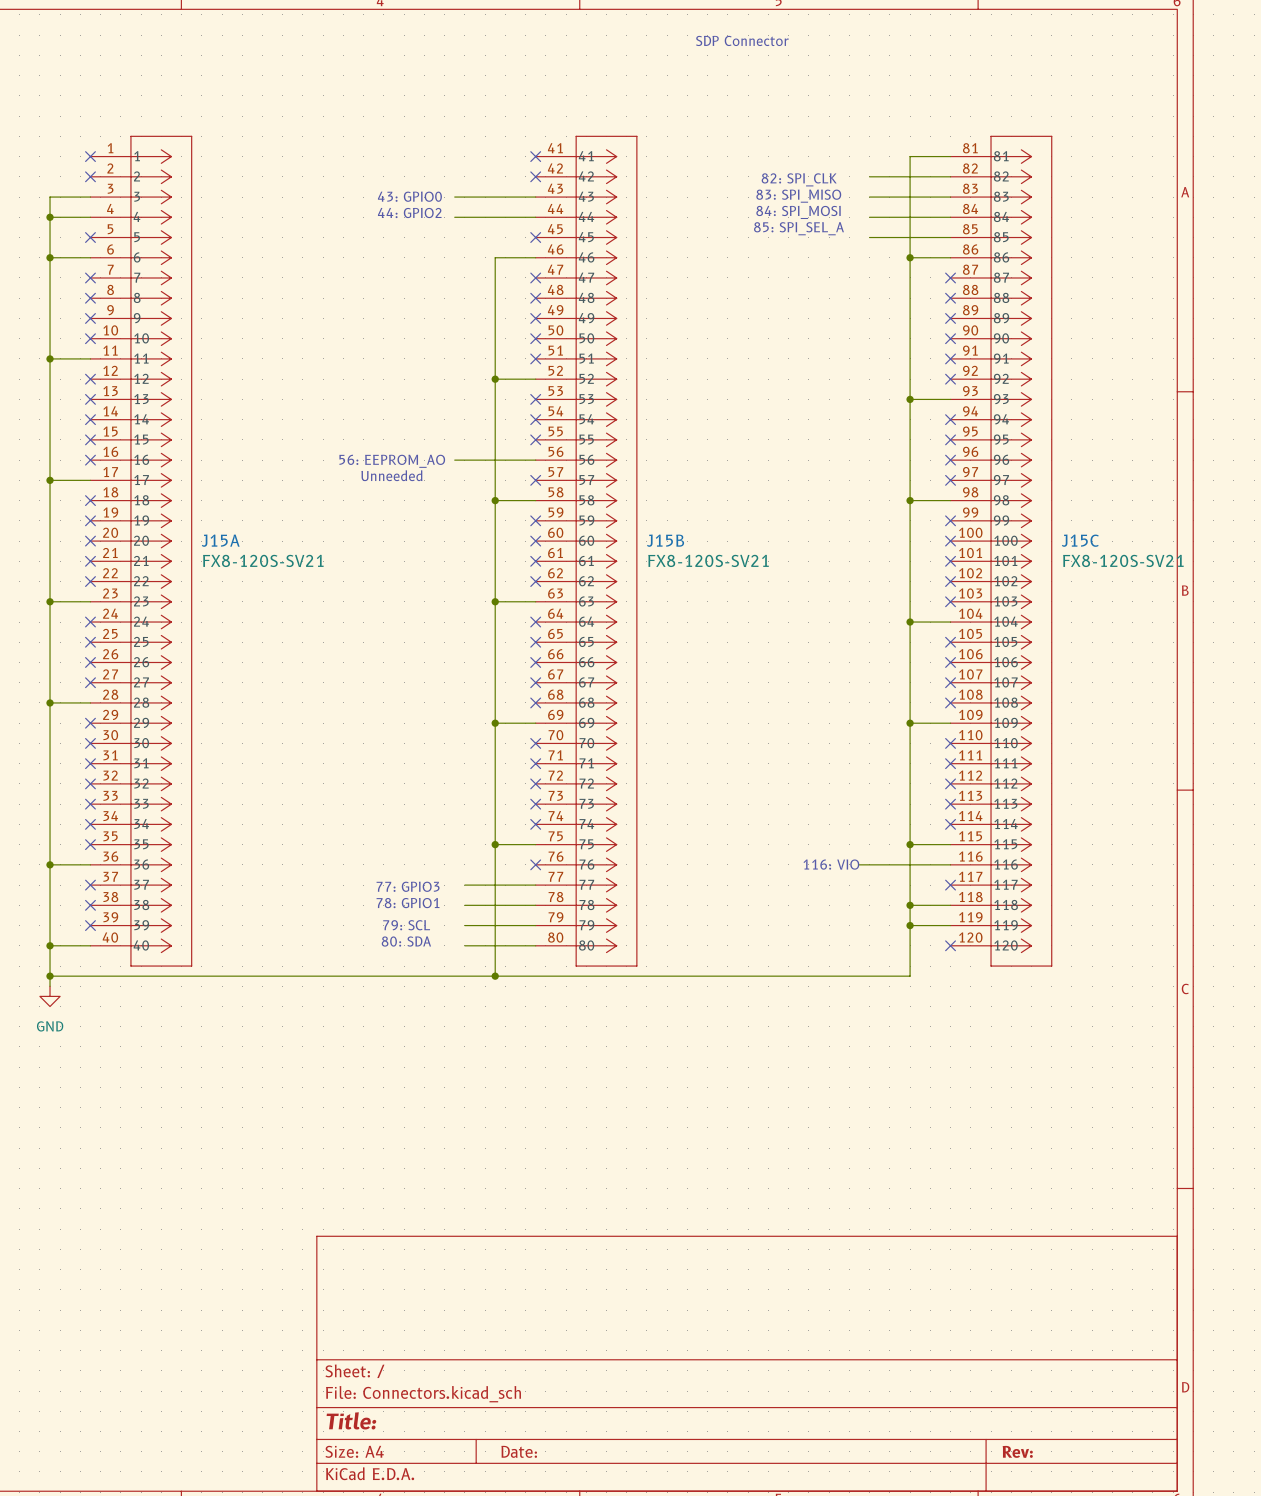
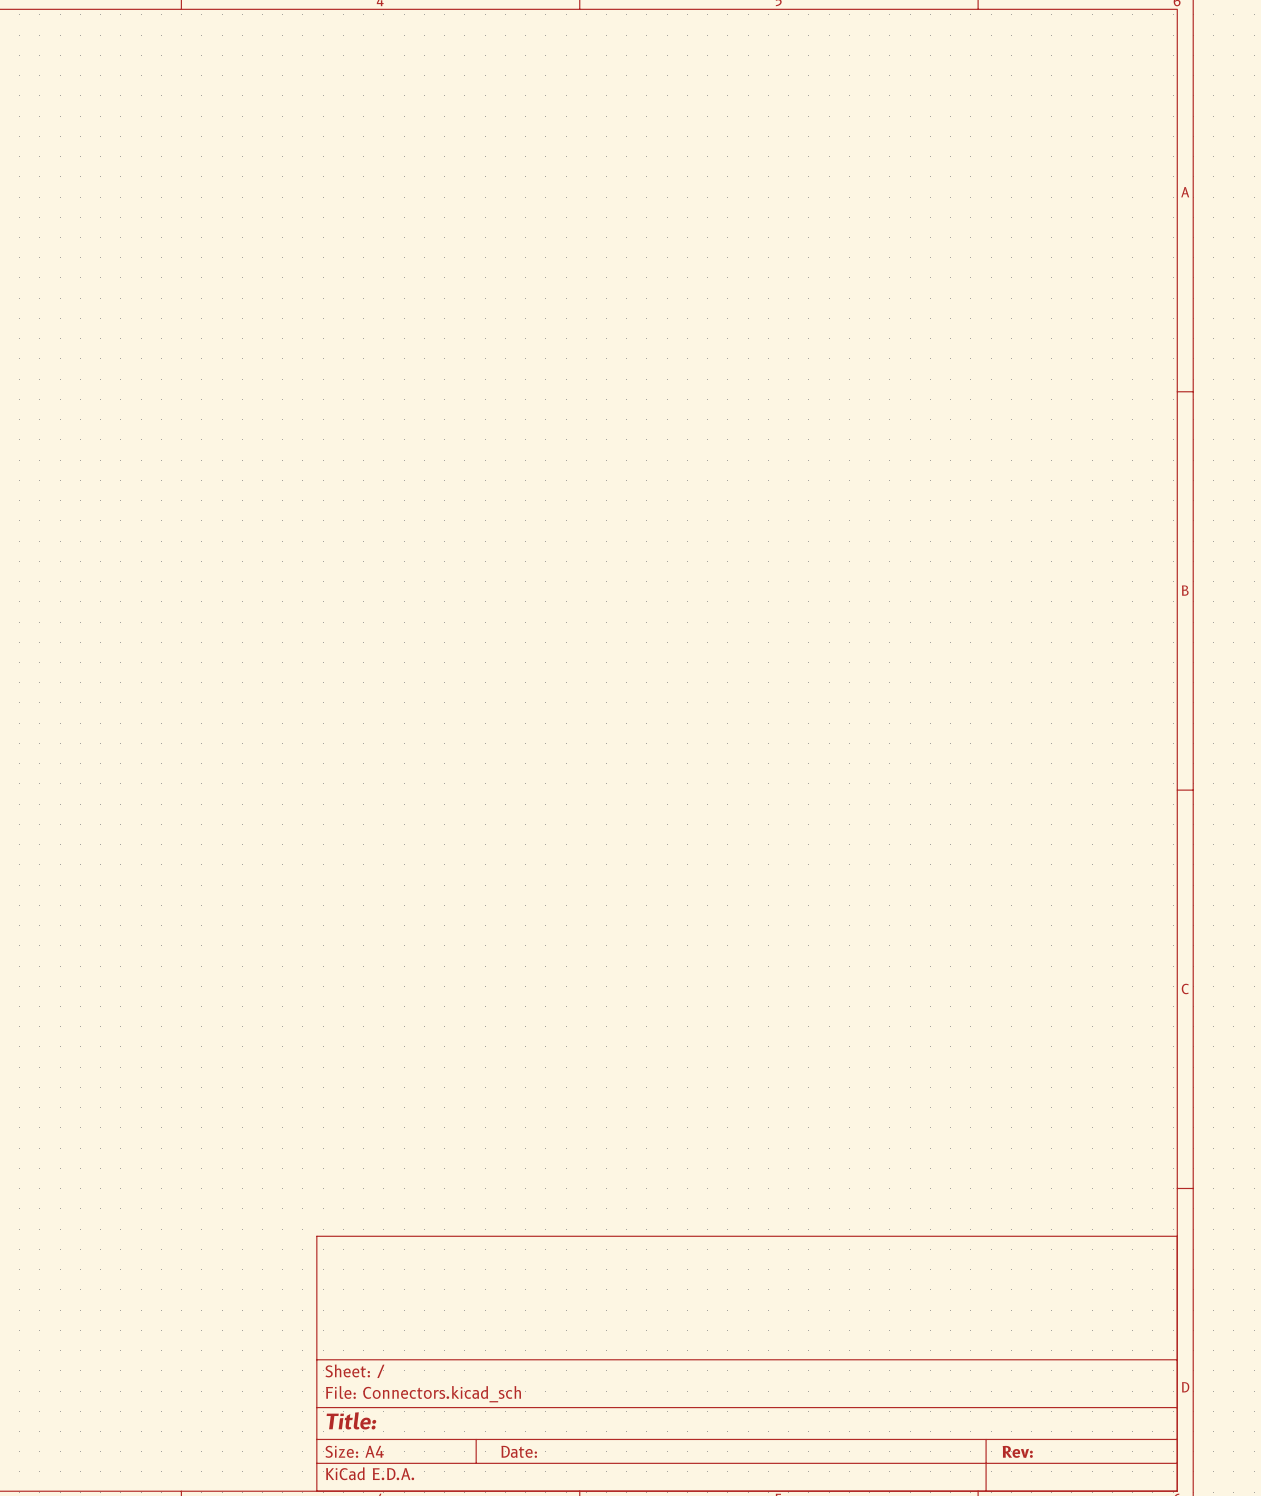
text: SDP Connector (742, 40) -> none
no-connect mark: (90, 156) -> none
no-connect mark: (535, 156) -> none
wire: (950, 156) (910, 156) (910, 976) (50, 976) -> none
no-connect mark: (90, 176) -> none
no-connect mark: (535, 176) -> none
wire: (869, 176) (950, 176) -> none
text: 82: SPI_CLK (799, 179) -> none
text: 43: GPIO0 (409, 196) -> none
text: 83: SPI_MISO (798, 196) -> none
wire: (90, 197) (50, 197) (50, 986) -> none
wire: (454, 197) (535, 197) -> none
wire: (869, 197) (950, 197) -> none
text: 84: SPI_MOSI (798, 212) -> none
text: 44: GPIO2 (409, 213) -> none
wire: (50, 217) (90, 217) -> none
junction: (50, 217) -> none
wire: (454, 217) (535, 217) -> none
wire: (869, 217) (950, 217) -> none
text: 85: SPI_SEL_A (798, 228) -> none
no-connect mark: (90, 237) -> none
no-connect mark: (535, 237) -> none
wire: (869, 237) (950, 237) -> none
wire: (50, 257) (90, 257) -> none
junction: (50, 257) -> none
wire: (535, 257) (495, 257) (495, 976) -> none
wire: (910, 257) (950, 257) -> none
junction: (910, 257) -> none
no-connect mark: (90, 277) -> none
no-connect mark: (535, 277) -> none
no-connect mark: (950, 277) -> none
no-connect mark: (90, 298) -> none
no-connect mark: (535, 298) -> none
no-connect mark: (950, 298) -> none
no-connect mark: (90, 318) -> none
no-connect mark: (535, 318) -> none
no-connect mark: (950, 318) -> none
no-connect mark: (90, 338) -> none
no-connect mark: (535, 338) -> none
no-connect mark: (950, 338) -> none
wire: (50, 358) (90, 358) -> none
junction: (50, 358) -> none
no-connect mark: (535, 358) -> none
no-connect mark: (950, 358) -> none
no-connect mark: (90, 379) -> none
wire: (495, 379) (535, 379) -> none
junction: (495, 379) -> none
no-connect mark: (950, 379) -> none
no-connect mark: (90, 399) -> none
no-connect mark: (535, 399) -> none
wire: (910, 399) (950, 399) -> none
junction: (910, 399) -> none
no-connect mark: (90, 419) -> none
no-connect mark: (535, 419) -> none
no-connect mark: (950, 419) -> none
no-connect mark: (90, 439) -> none
no-connect mark: (535, 439) -> none
no-connect mark: (950, 439) -> none
no-connect mark: (90, 460) -> none
wire: (454, 460) (535, 460) -> none
no-connect mark: (950, 460) -> none
text: 56: EEPROM_AO (392, 461) -> none
text: Unneeded (391, 475) -> none
wire: (50, 480) (90, 480) -> none
junction: (50, 480) -> none
no-connect mark: (535, 480) -> none
no-connect mark: (950, 480) -> none
no-connect mark: (90, 500) -> none
wire: (495, 500) (535, 500) -> none
junction: (495, 500) -> none
wire: (910, 500) (950, 500) -> none
junction: (910, 500) -> none
no-connect mark: (90, 520) -> none
no-connect mark: (535, 520) -> none
no-connect mark: (950, 520) -> none
no-connect mark: (90, 541) -> none
no-connect mark: (535, 541) -> none
no-connect mark: (950, 541) -> none
J15A: FX8-120S-SV21 (141, 551) -> none
J15B: FX8-120S-SV21 (586, 551) -> none
J15C: FX8-120S-SV21 (1001, 551) -> none
no-connect mark: (90, 561) -> none
no-connect mark: (535, 561) -> none
no-connect mark: (950, 561) -> none
no-connect mark: (90, 581) -> none
no-connect mark: (535, 581) -> none
no-connect mark: (950, 581) -> none
wire: (50, 601) (90, 601) -> none
junction: (50, 601) -> none
wire: (495, 601) (535, 601) -> none
junction: (495, 601) -> none
no-connect mark: (950, 601) -> none
no-connect mark: (90, 622) -> none
no-connect mark: (535, 622) -> none
wire: (910, 622) (950, 622) -> none
junction: (910, 622) -> none
no-connect mark: (90, 642) -> none
no-connect mark: (535, 642) -> none
no-connect mark: (950, 642) -> none
no-connect mark: (90, 662) -> none
no-connect mark: (535, 662) -> none
no-connect mark: (950, 662) -> none
no-connect mark: (90, 682) -> none
no-connect mark: (535, 682) -> none
no-connect mark: (950, 682) -> none
wire: (50, 702) (90, 702) -> none
junction: (50, 702) -> none
no-connect mark: (535, 702) -> none
no-connect mark: (950, 702) -> none
no-connect mark: (90, 723) -> none
wire: (495, 723) (535, 723) -> none
junction: (495, 723) -> none
wire: (910, 723) (950, 723) -> none
junction: (910, 723) -> none
no-connect mark: (90, 743) -> none
no-connect mark: (535, 743) -> none
no-connect mark: (950, 743) -> none
no-connect mark: (90, 763) -> none
no-connect mark: (535, 763) -> none
no-connect mark: (950, 763) -> none
no-connect mark: (90, 783) -> none
no-connect mark: (535, 783) -> none
no-connect mark: (950, 783) -> none
no-connect mark: (90, 804) -> none
no-connect mark: (535, 804) -> none
no-connect mark: (950, 804) -> none
no-connect mark: (90, 824) -> none
no-connect mark: (535, 824) -> none
no-connect mark: (950, 824) -> none
no-connect mark: (90, 844) -> none
wire: (495, 844) (535, 844) -> none
junction: (495, 844) -> none
wire: (910, 844) (950, 844) -> none
junction: (910, 844) -> none
wire: (50, 864) (90, 864) -> none
junction: (50, 864) -> none
no-connect mark: (535, 864) -> none
text: 116: VIO (831, 864) -> none
wire: (859, 864) (950, 864) -> none
no-connect mark: (90, 885) -> none
wire: (464, 885) (535, 885) -> none
no-connect mark: (950, 885) -> none
text: 77: GPIO3 (408, 886) -> none
text: 78: GPIO1 (408, 903) -> none
no-connect mark: (90, 905) -> none
wire: (464, 905) (535, 905) -> none
wire: (910, 905) (950, 905) -> none
junction: (910, 905) -> none
no-connect mark: (90, 925) -> none
text: 79: SCL (406, 925) -> none
wire: (464, 925) (535, 925) -> none
wire: (910, 925) (950, 925) -> none
junction: (910, 925) -> none
text: 80: SDA (406, 941) -> none
wire: (50, 945) (90, 945) -> none
junction: (50, 945) -> none
wire: (464, 945) (535, 945) -> none
no-connect mark: (950, 945) -> none
junction: (50, 976) -> none
junction: (495, 976) -> none
power symbol: GND (50, 996) -> none

